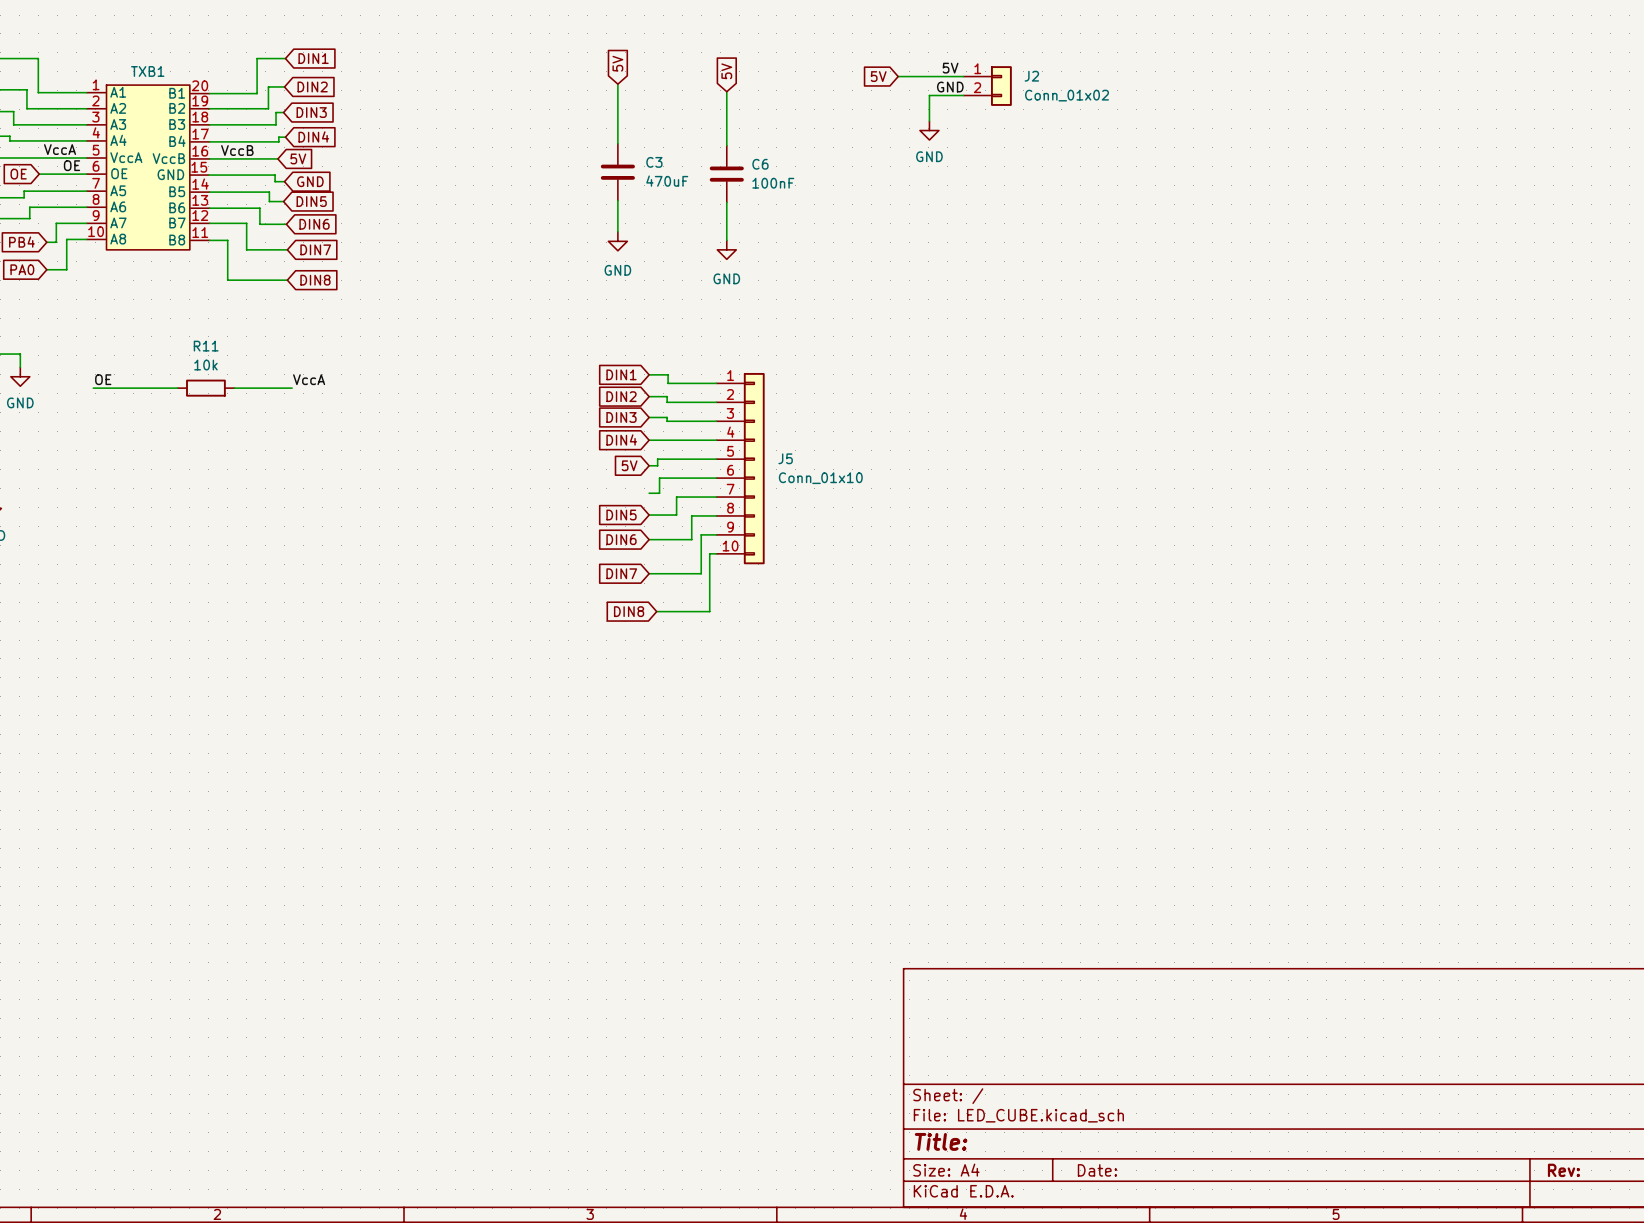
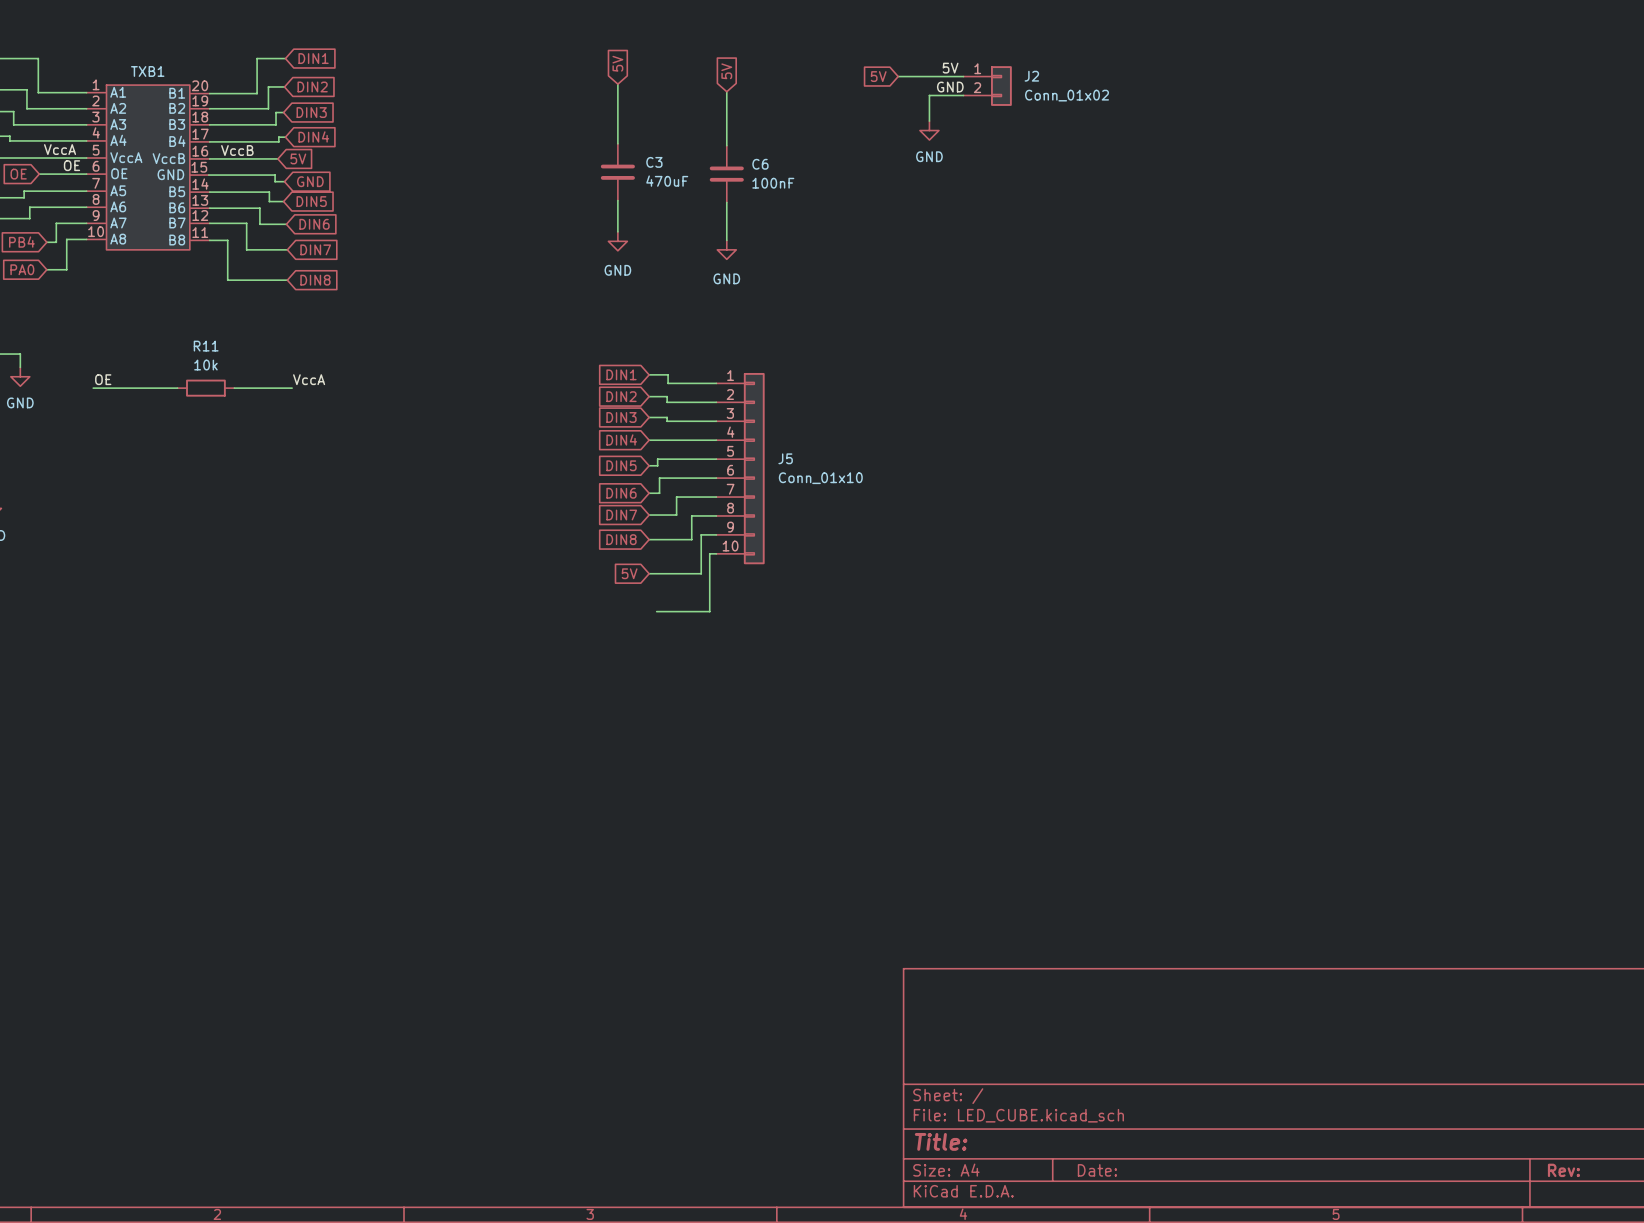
global label: 5V (629, 465) -> DIN5 (621, 465)
global label: none -> DIN6 (621, 493)
global label: DIN5 (621, 515) -> DIN7 (621, 515)
global label: DIN6 (621, 539) -> DIN8 (621, 539)
global label: DIN7 (621, 573) -> 5V (629, 573)
global label: DIN8 (629, 611) -> none

